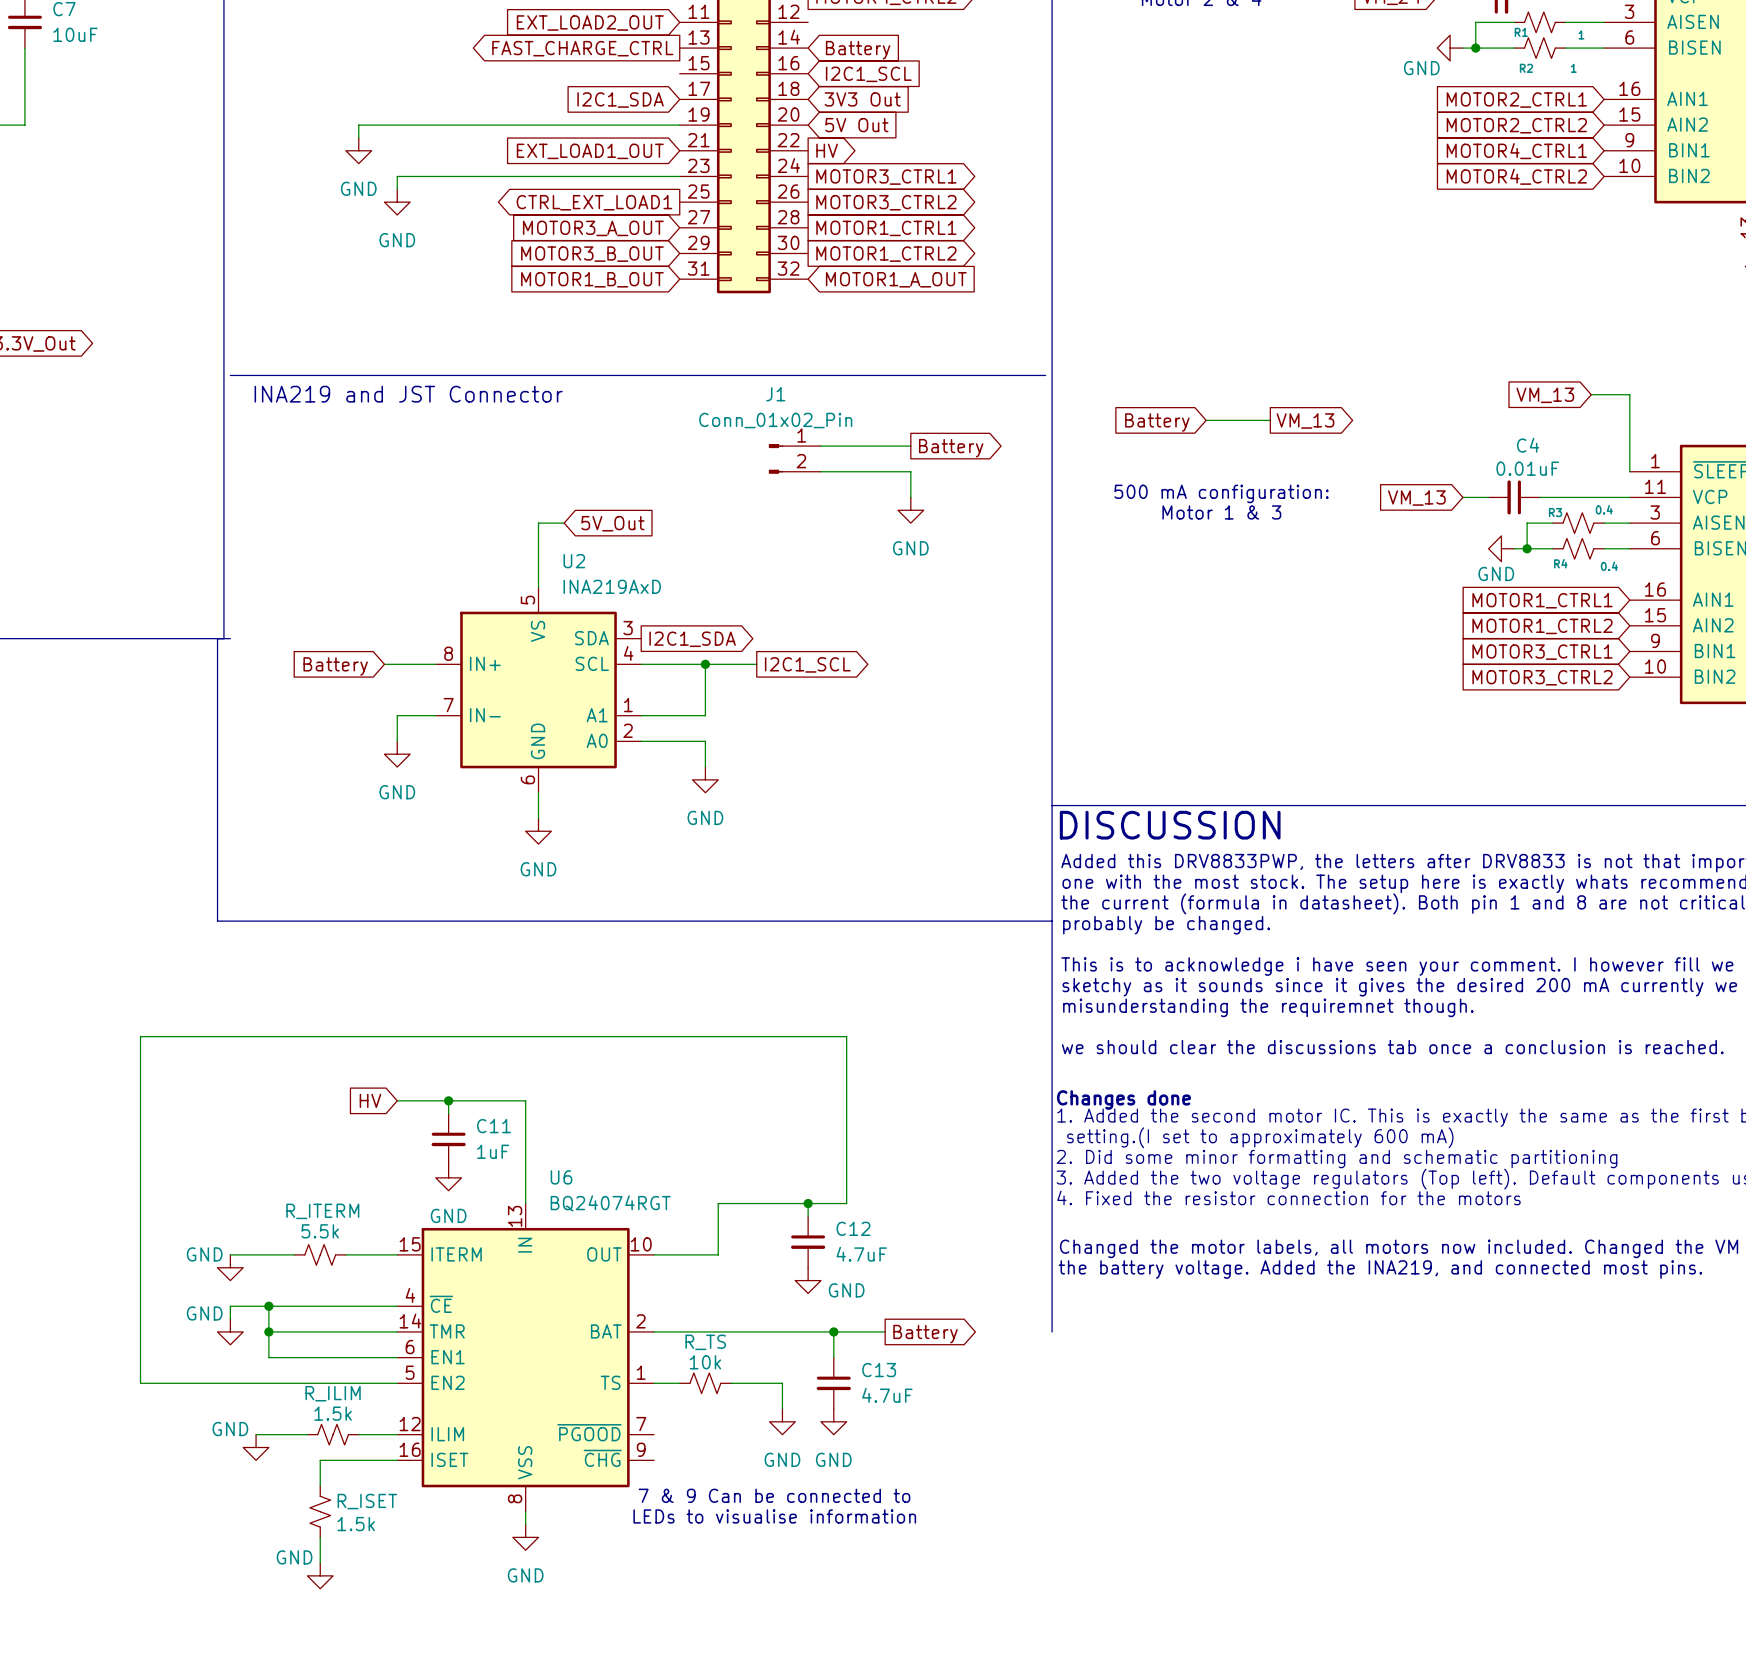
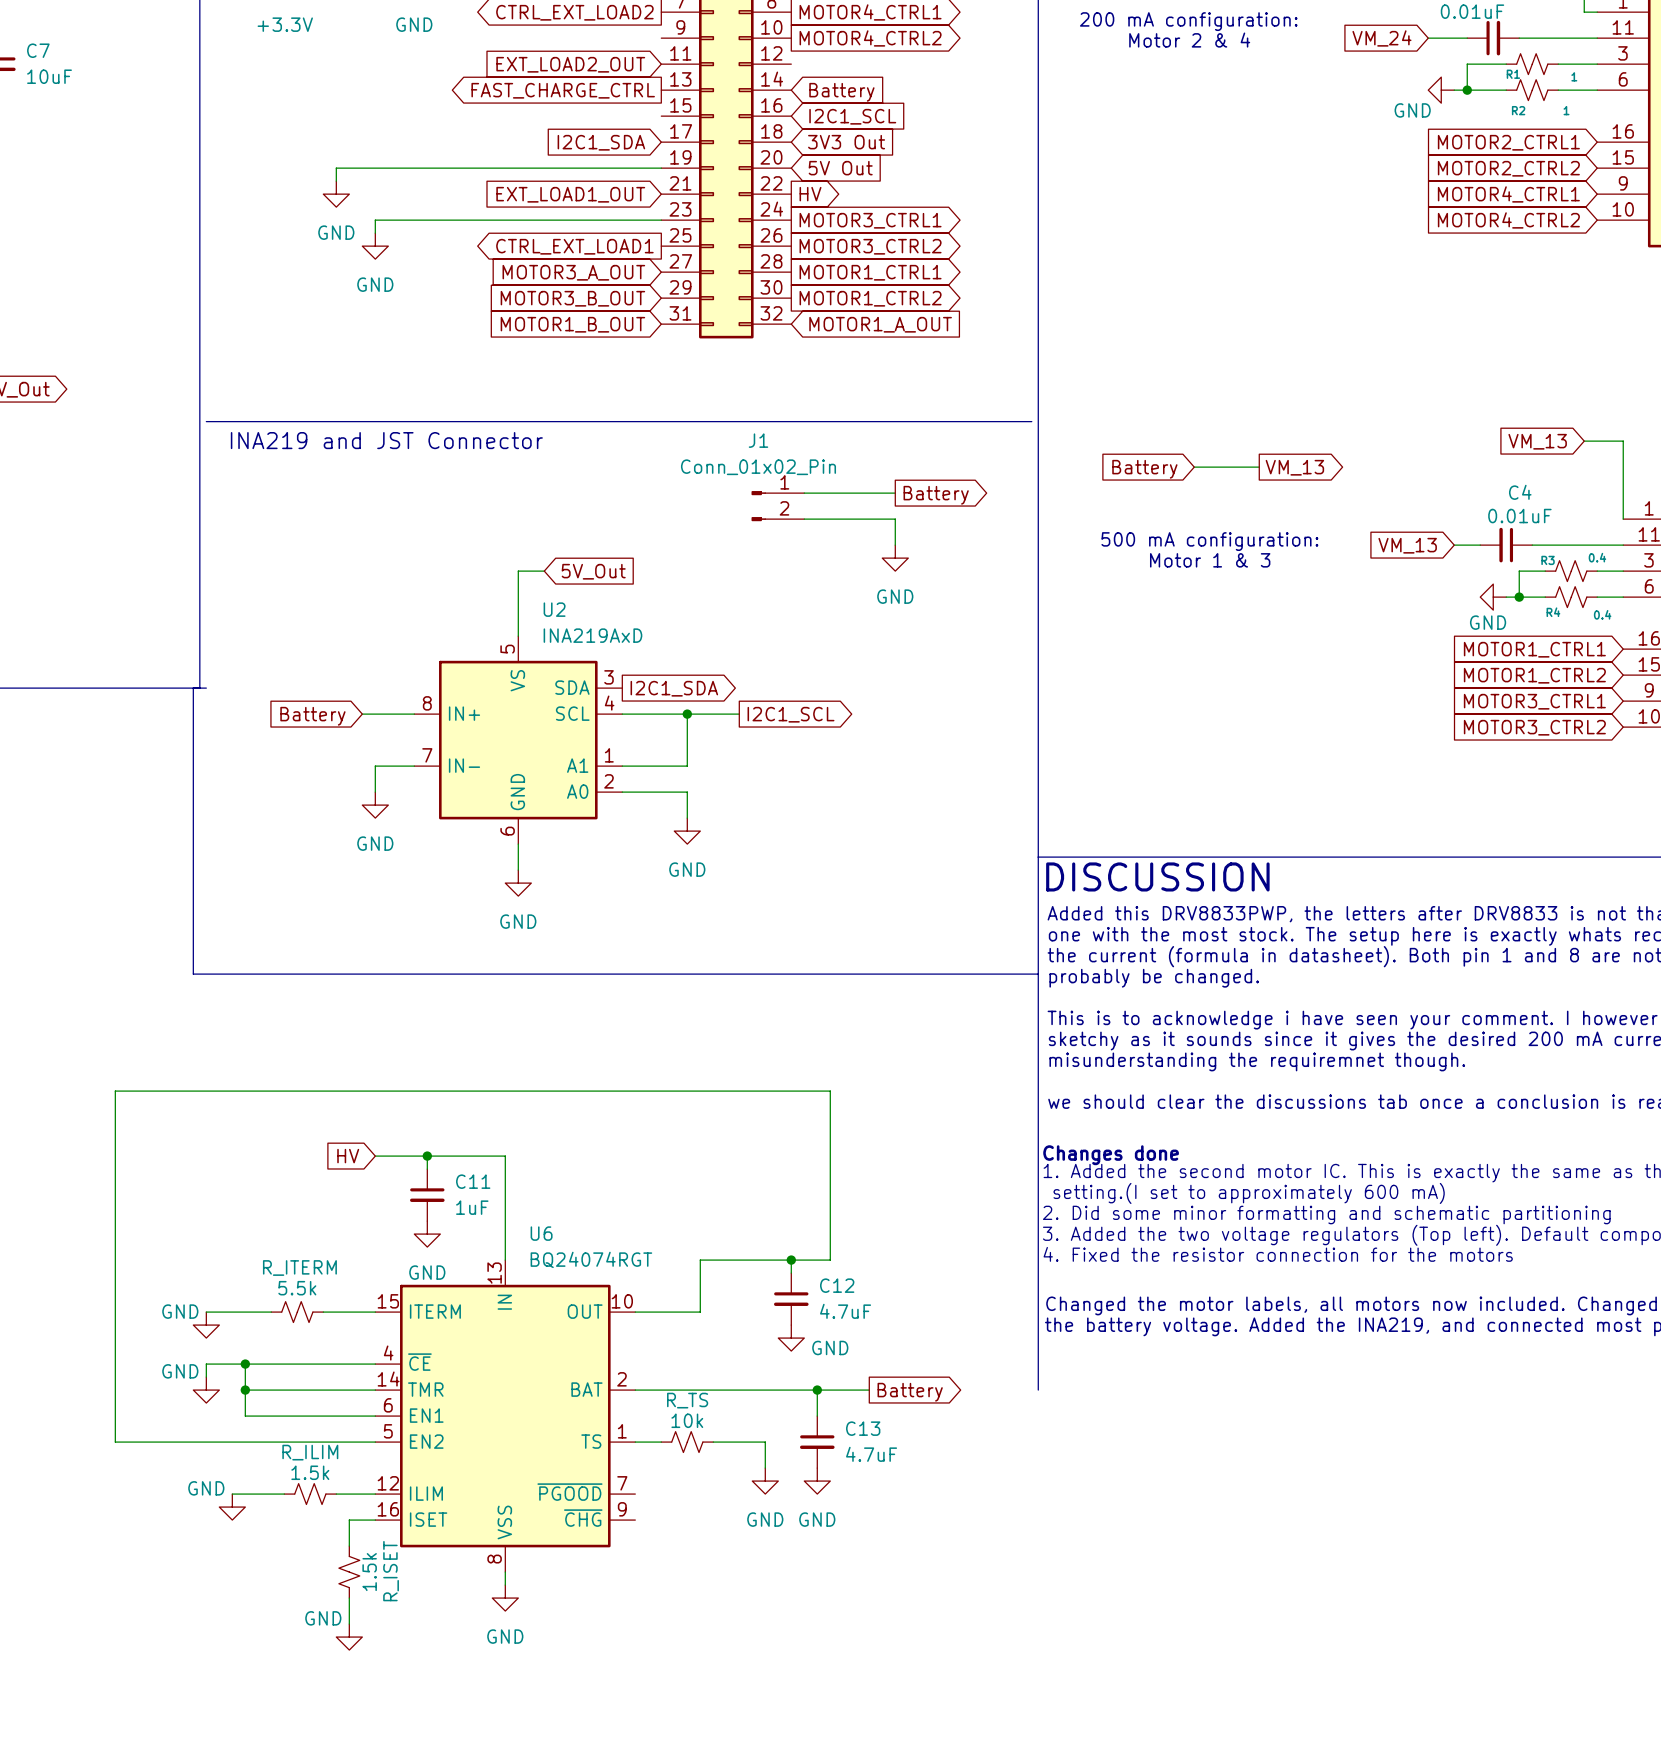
wire: (371, 1460) (320, 1460) (320, 1486) -> (349, 1520) (349, 1546)
text: 7 & 9 Can be connected to (774, 1495) -> none
R_ISET name rotation: 0° (367, 1501) -> 90° counterclockwise (391, 1571)
R_ISET position: (320, 1511) -> (349, 1572)
text: LEDs to visualise information (774, 1516) -> none
R_ISET value rotation: 0° (356, 1524) -> 90° counterclockwise (369, 1572)
wire: (320, 1537) (320, 1563) -> (349, 1598) (349, 1624)
power symbol position: GND (320, 1575) -> GND (349, 1637)

